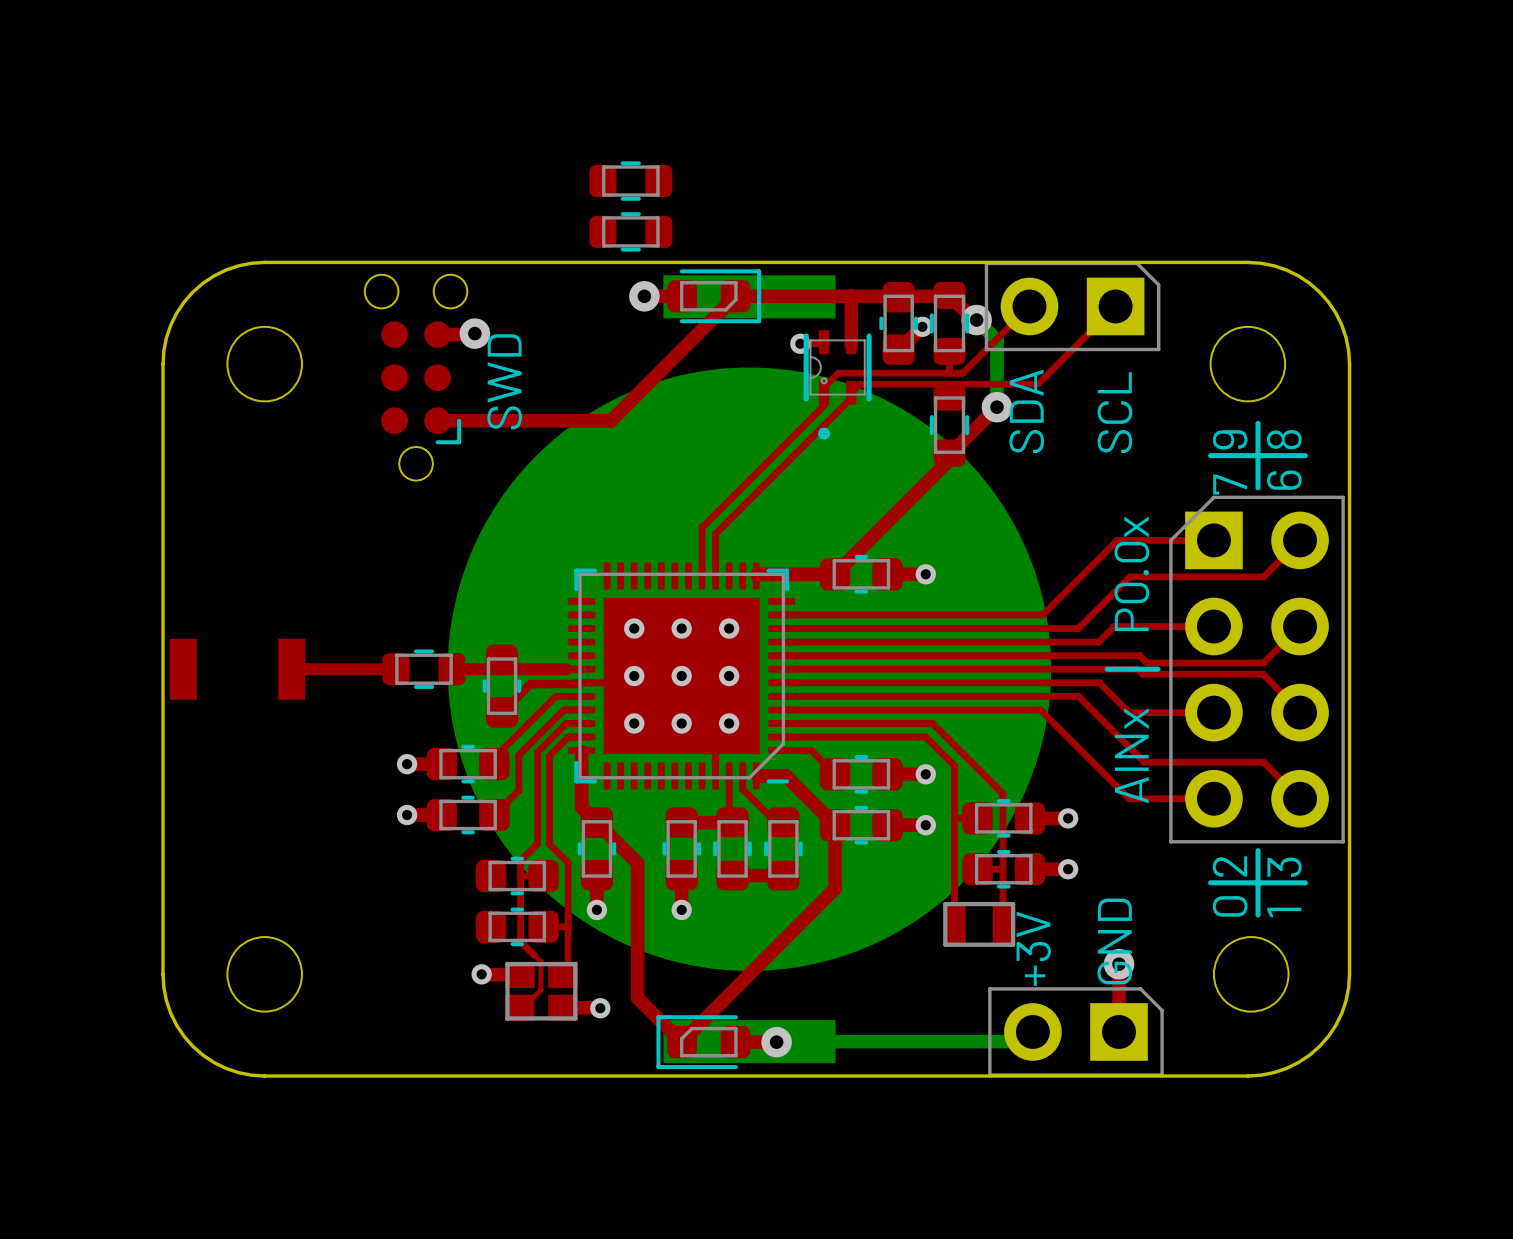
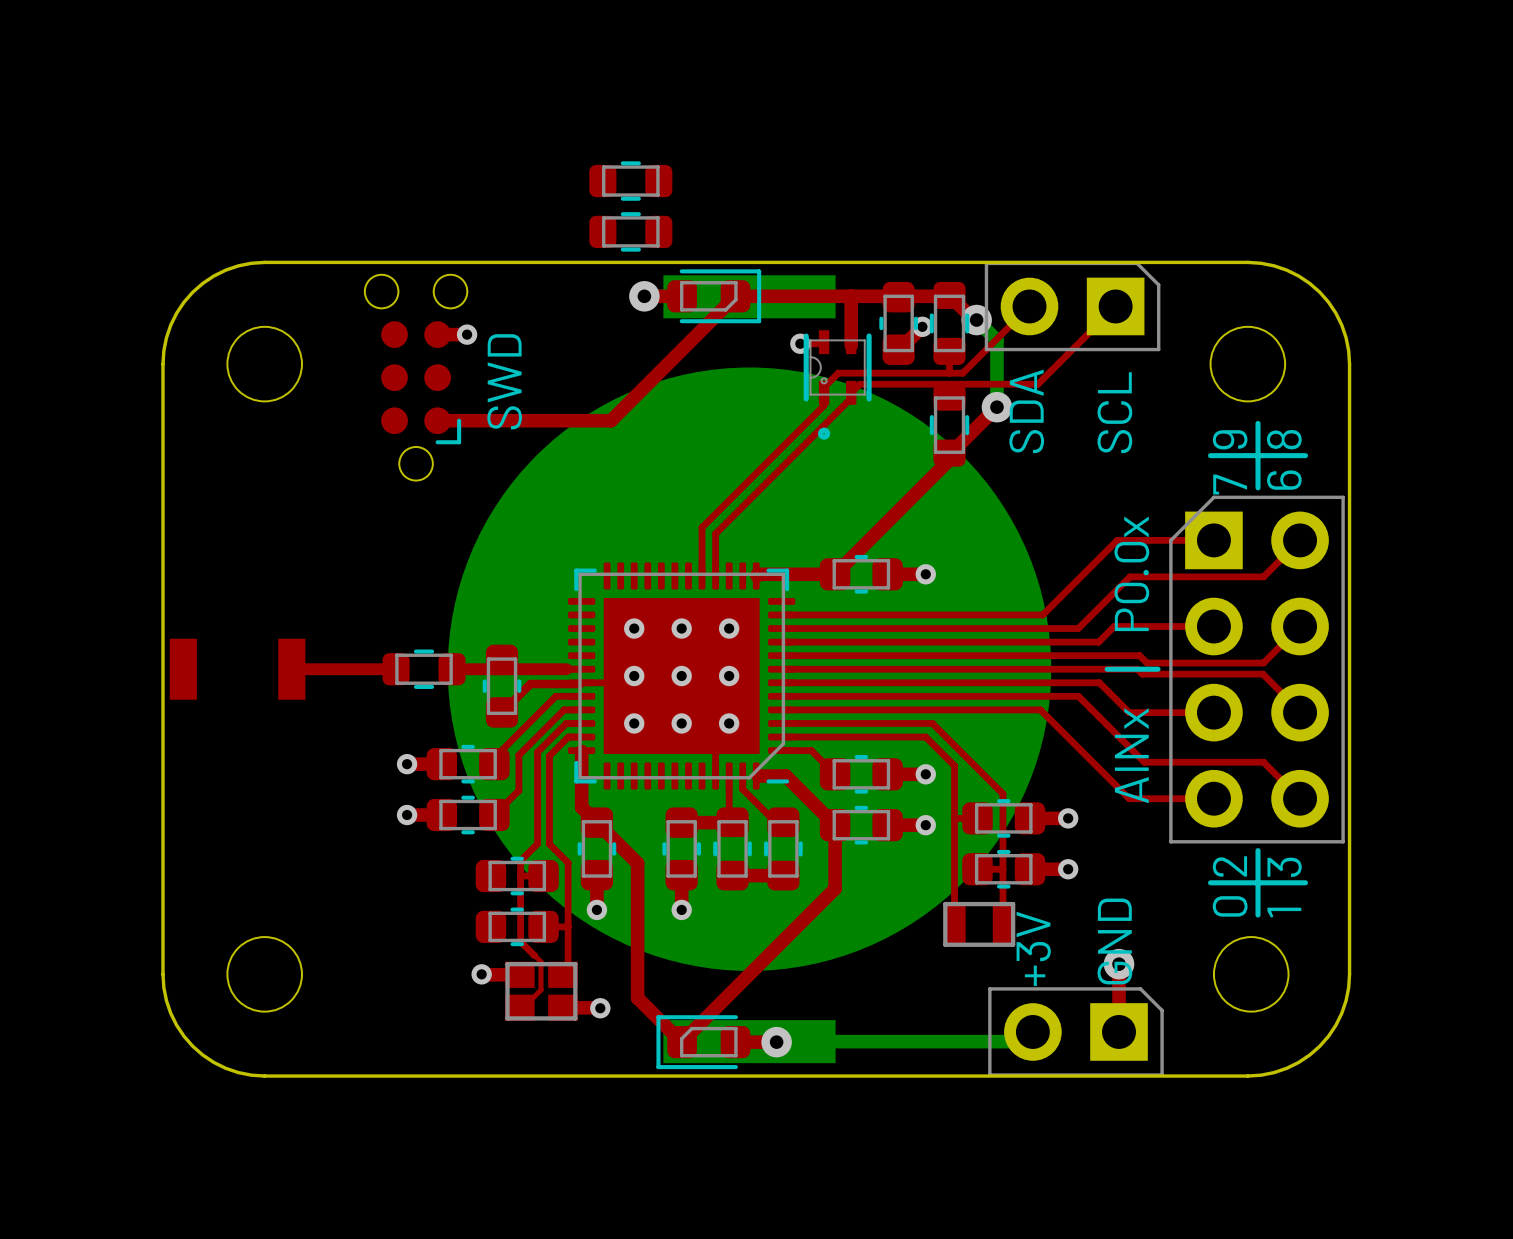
via size: [459, 318, 491, 349] -> [456, 324, 478, 345]

